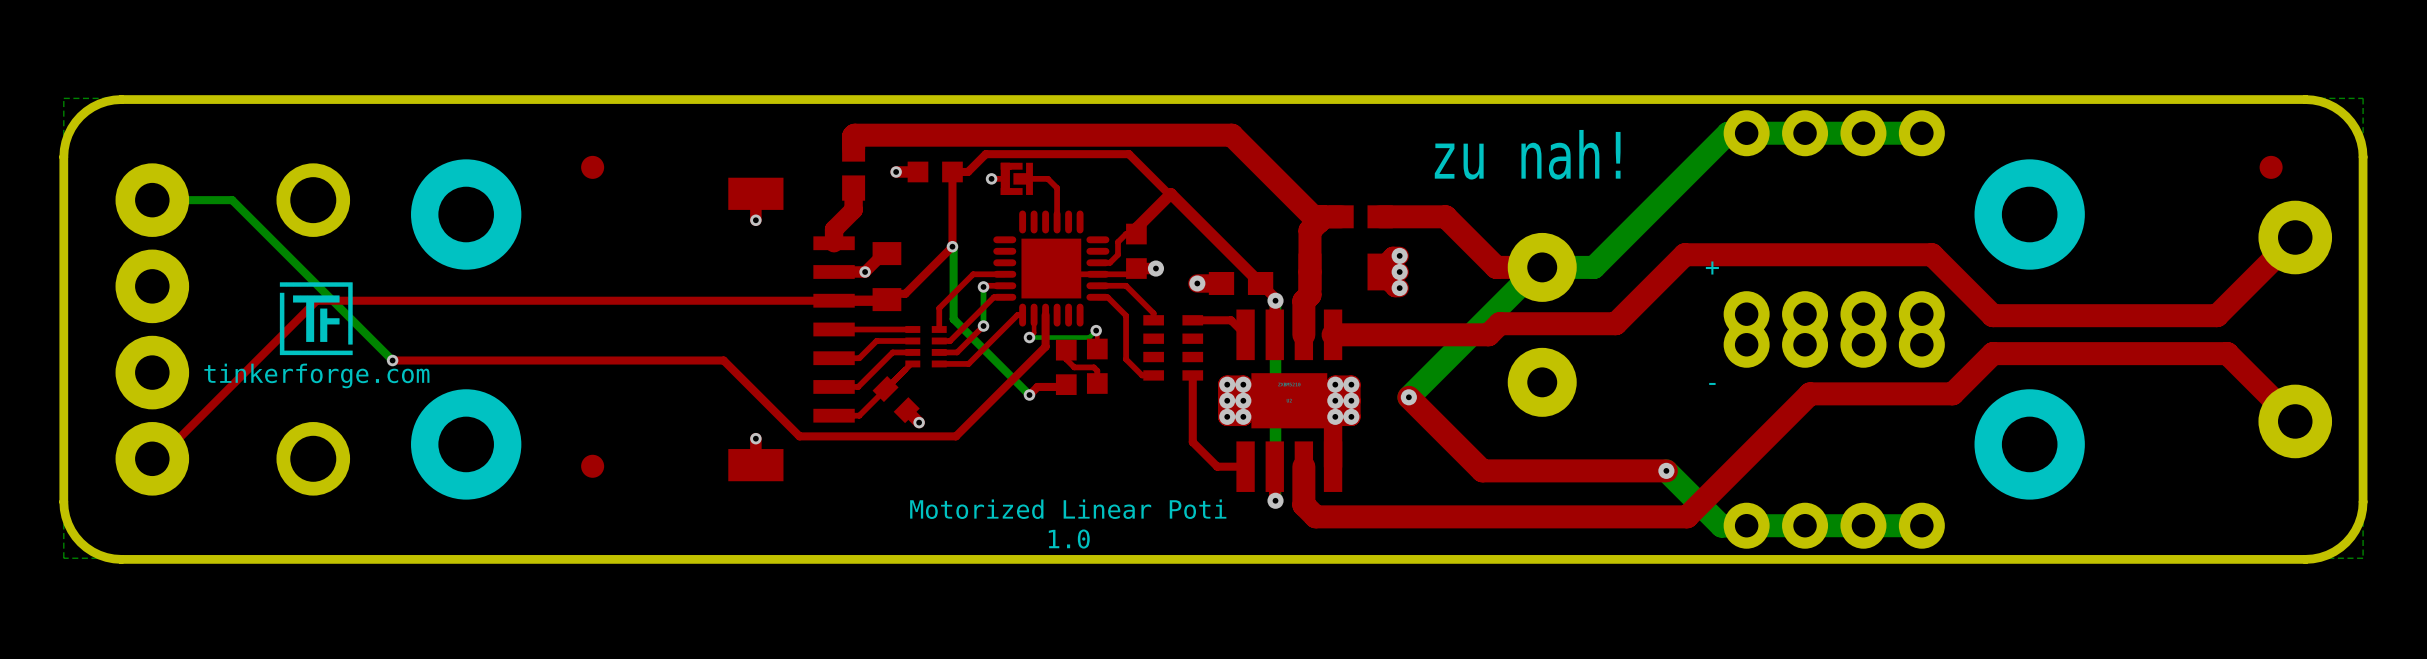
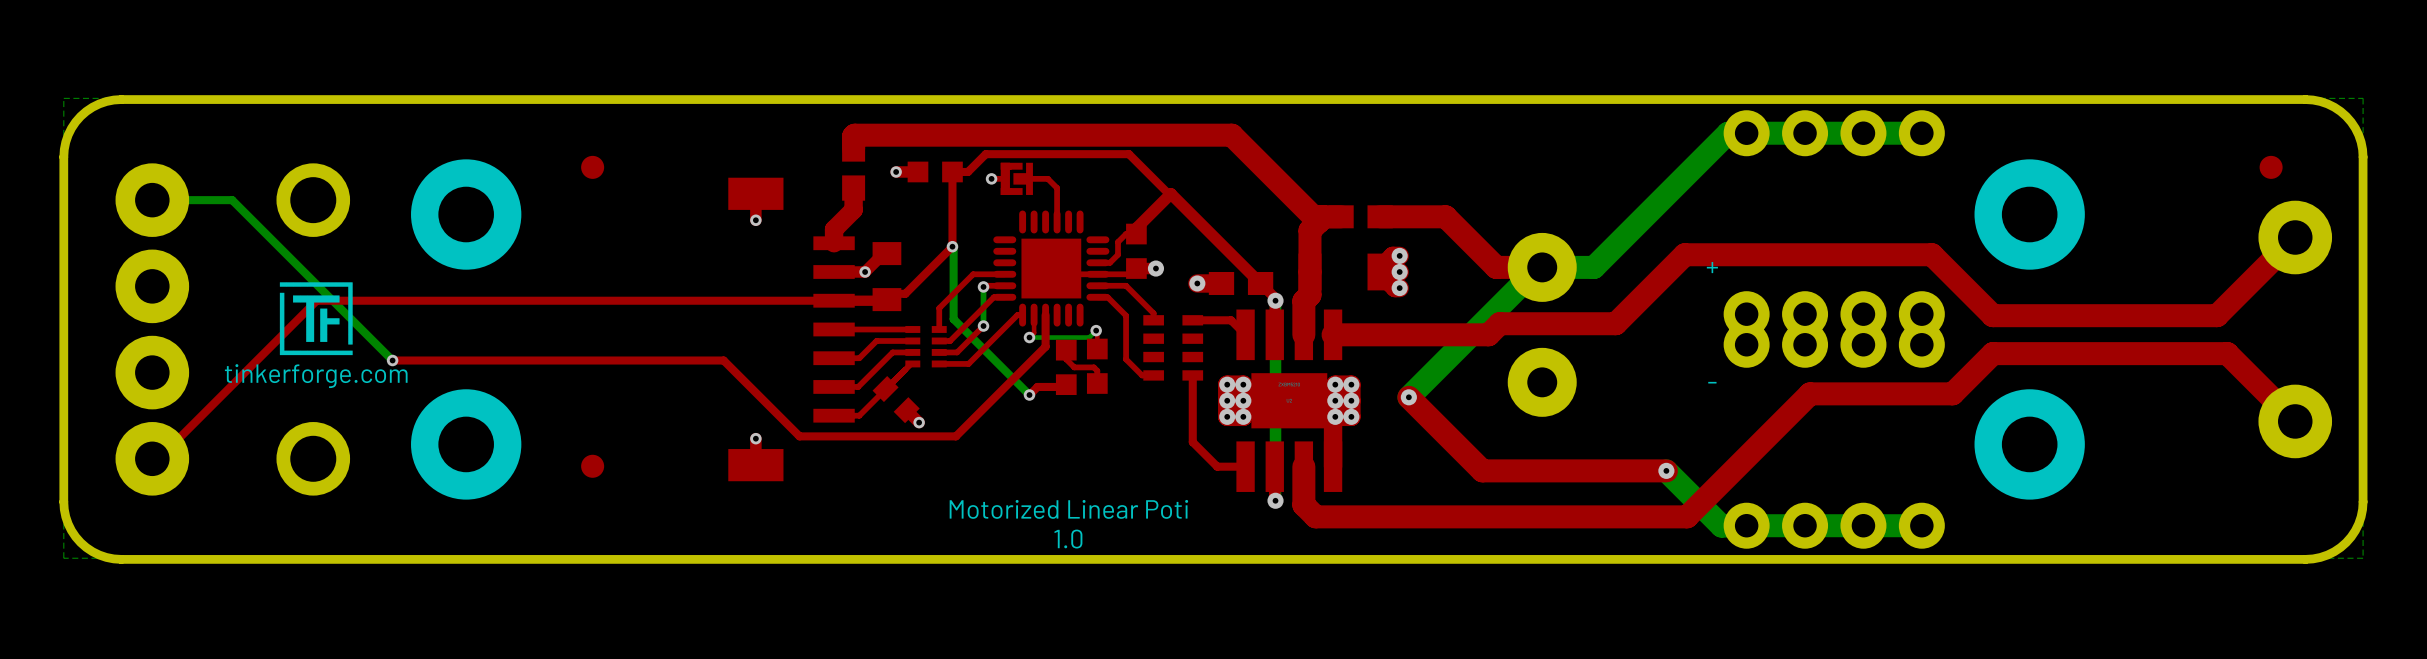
text: zu nah! (1527, 154) -> none

